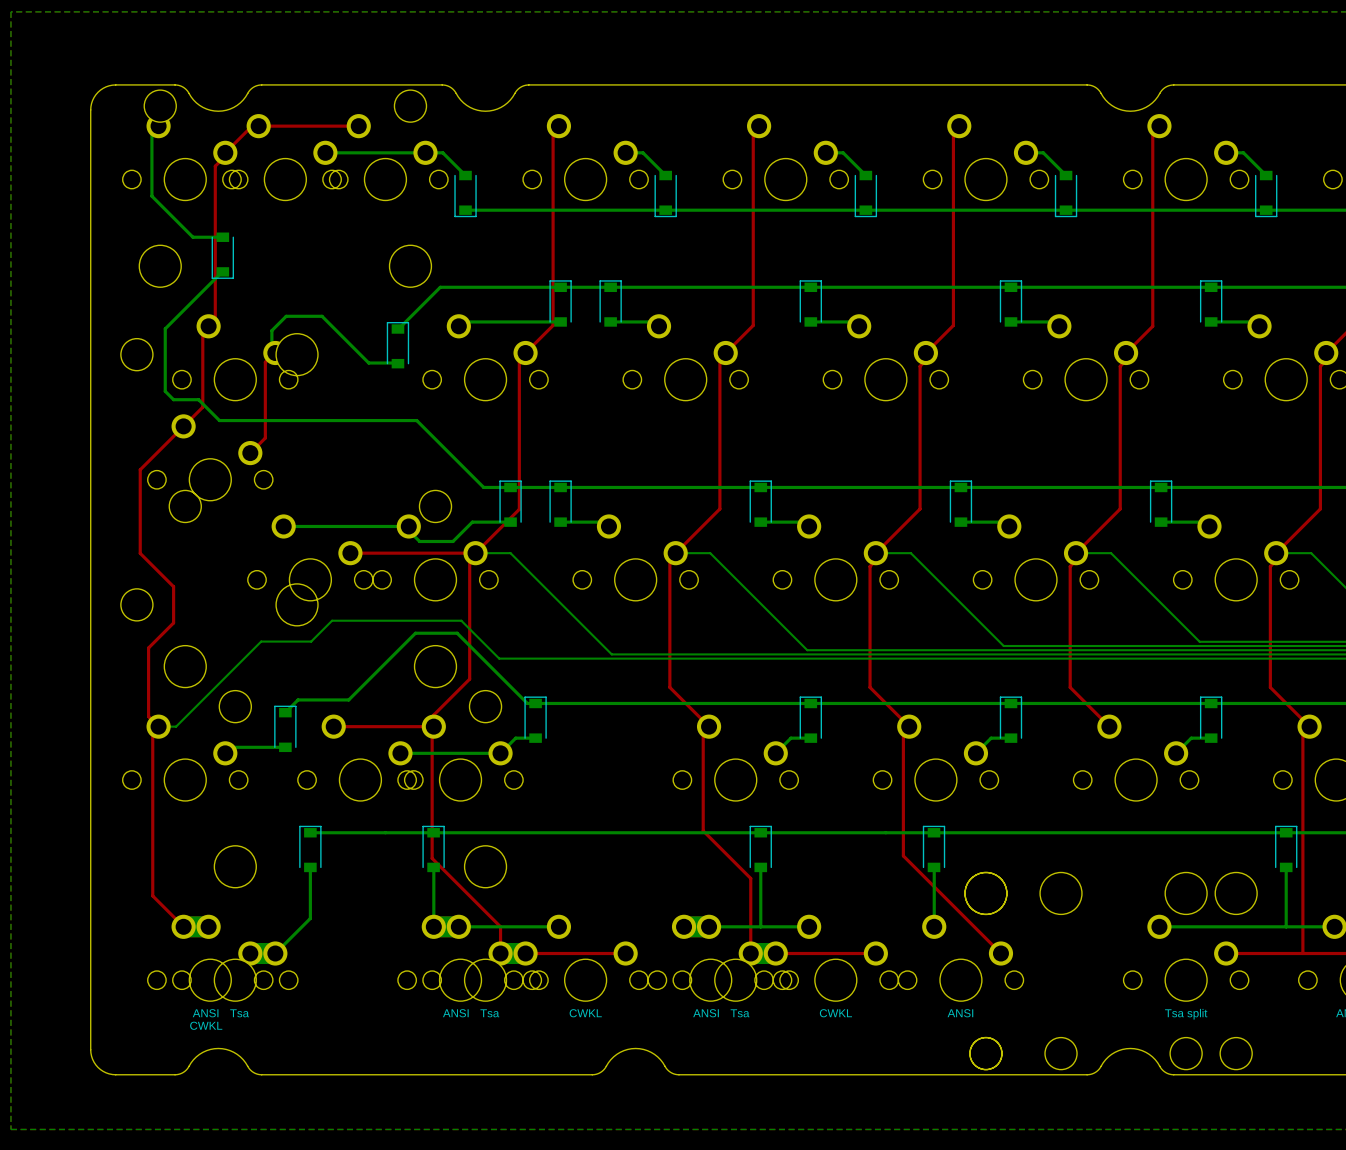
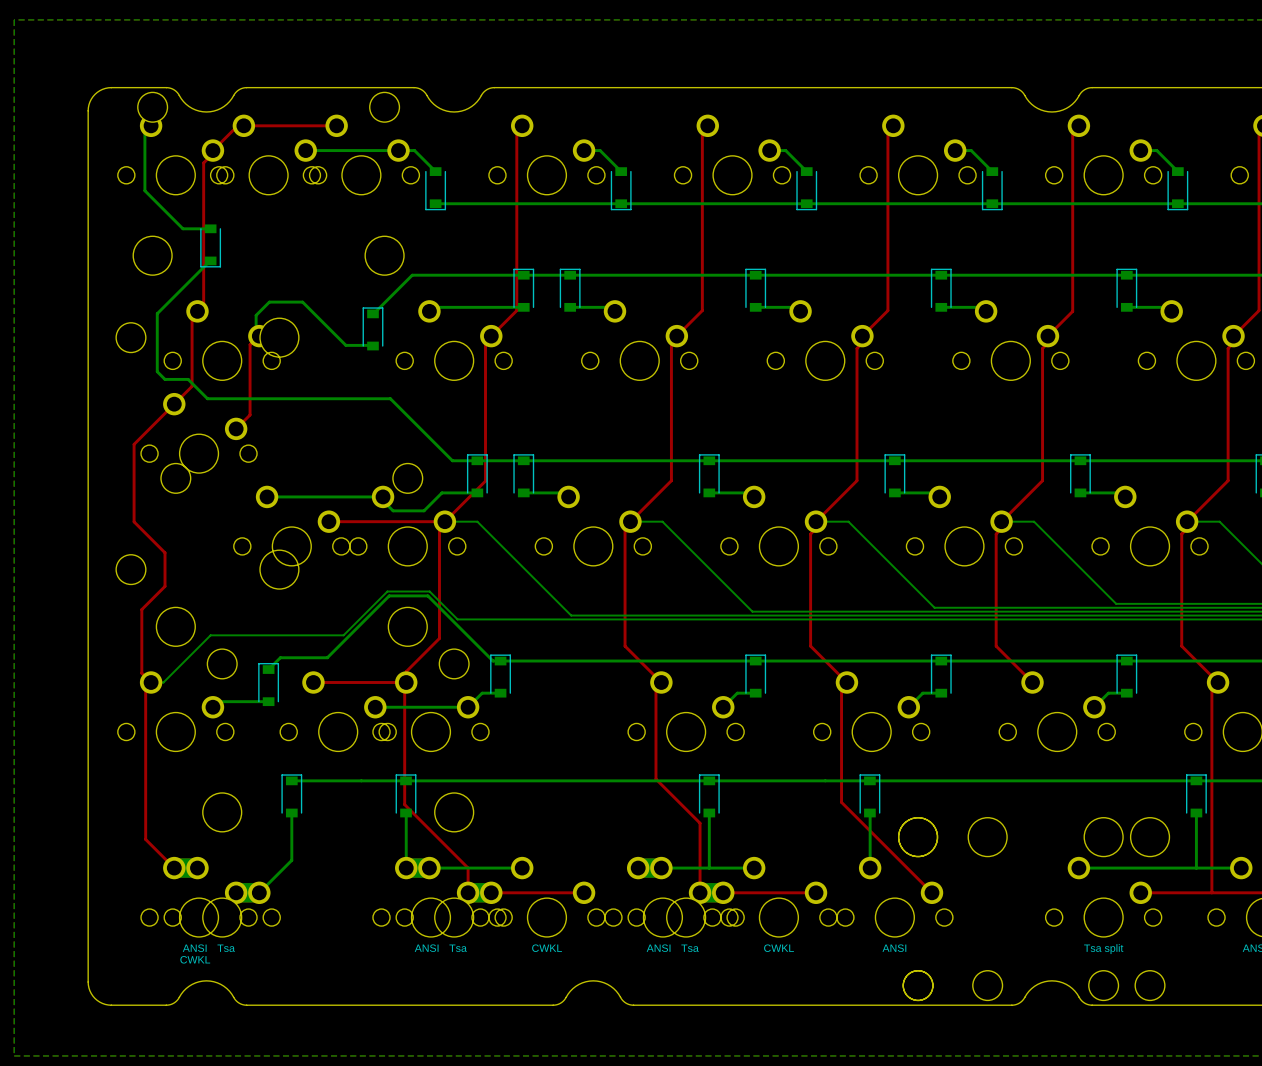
bottom track: (499, 658) (461, 620) (332, 620) (311, 641) (261, 641) (176, 726) (171, 726) -> (466, 619) (457, 619) (429, 591) (387, 591) (343, 635) (210, 635) (163, 682)

